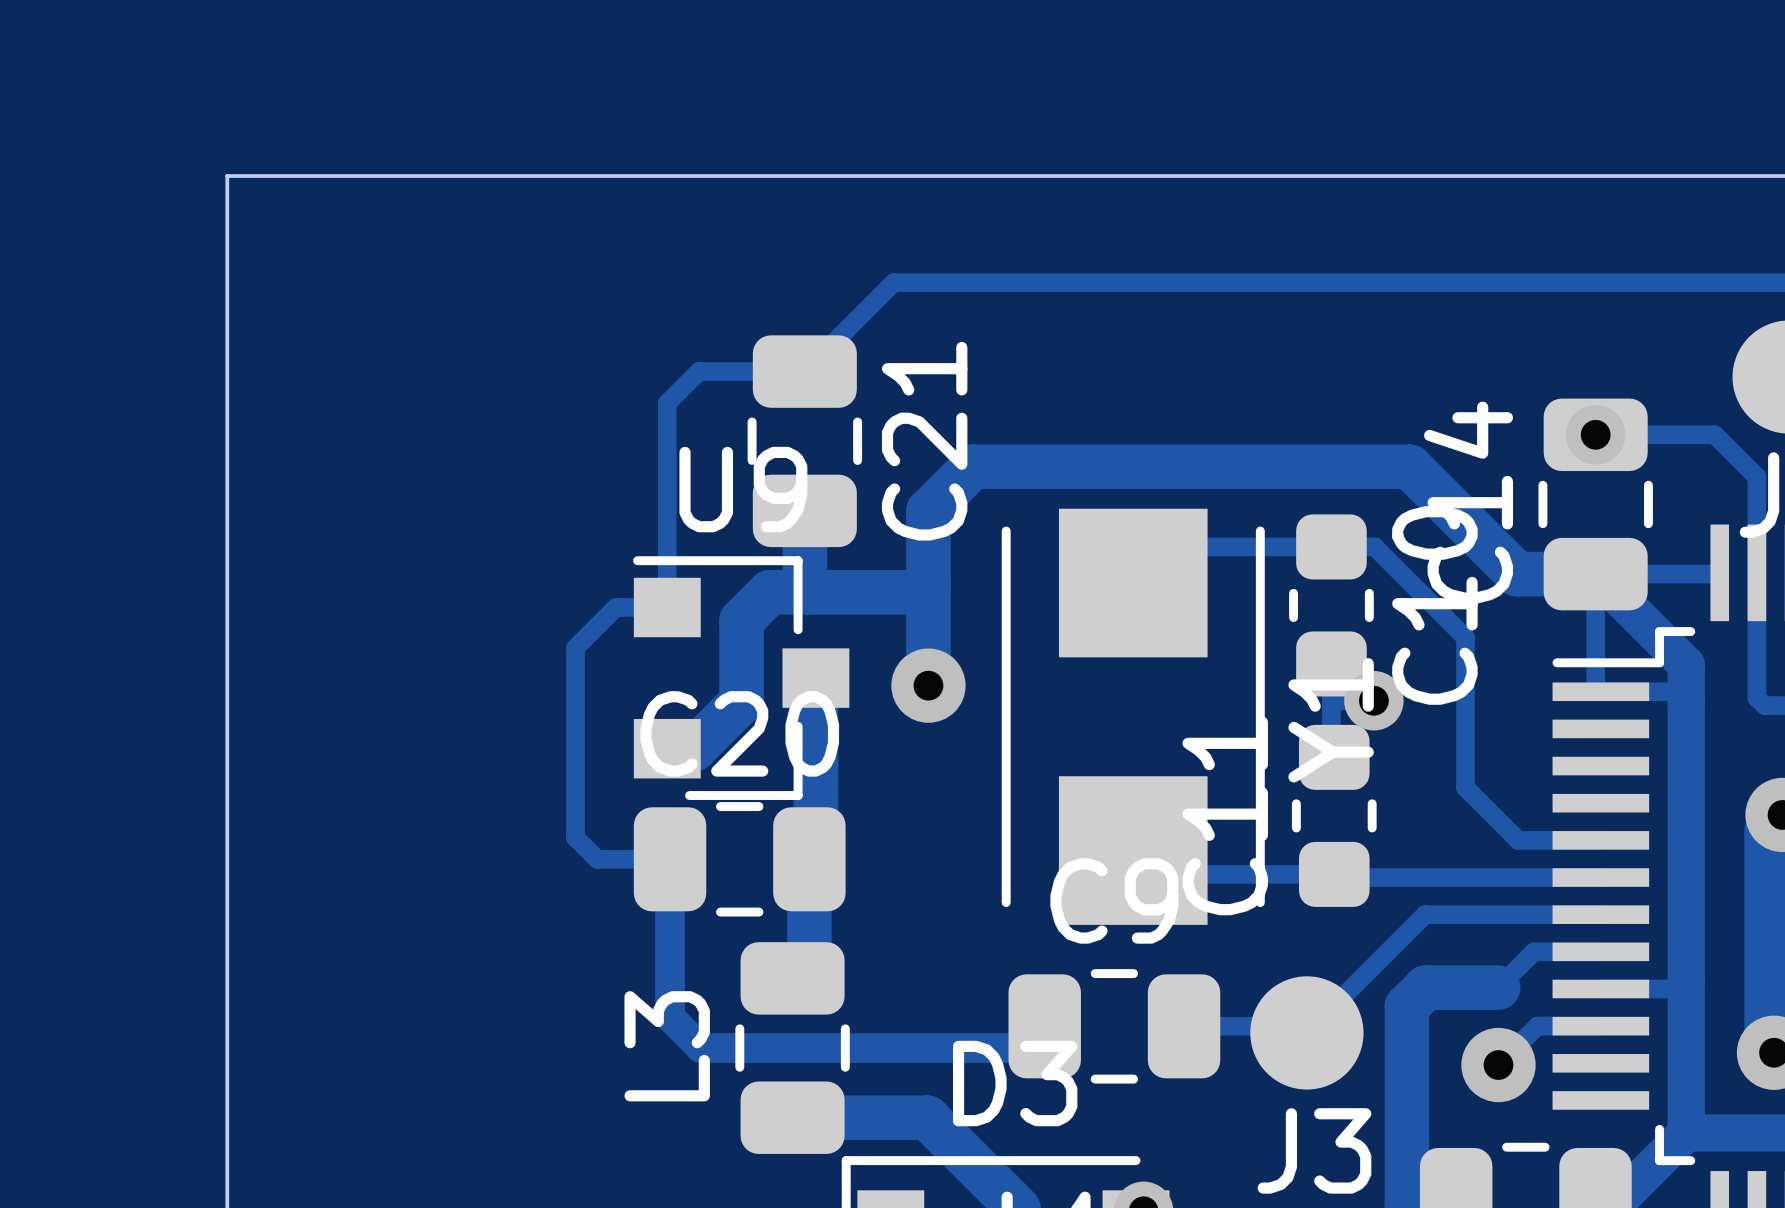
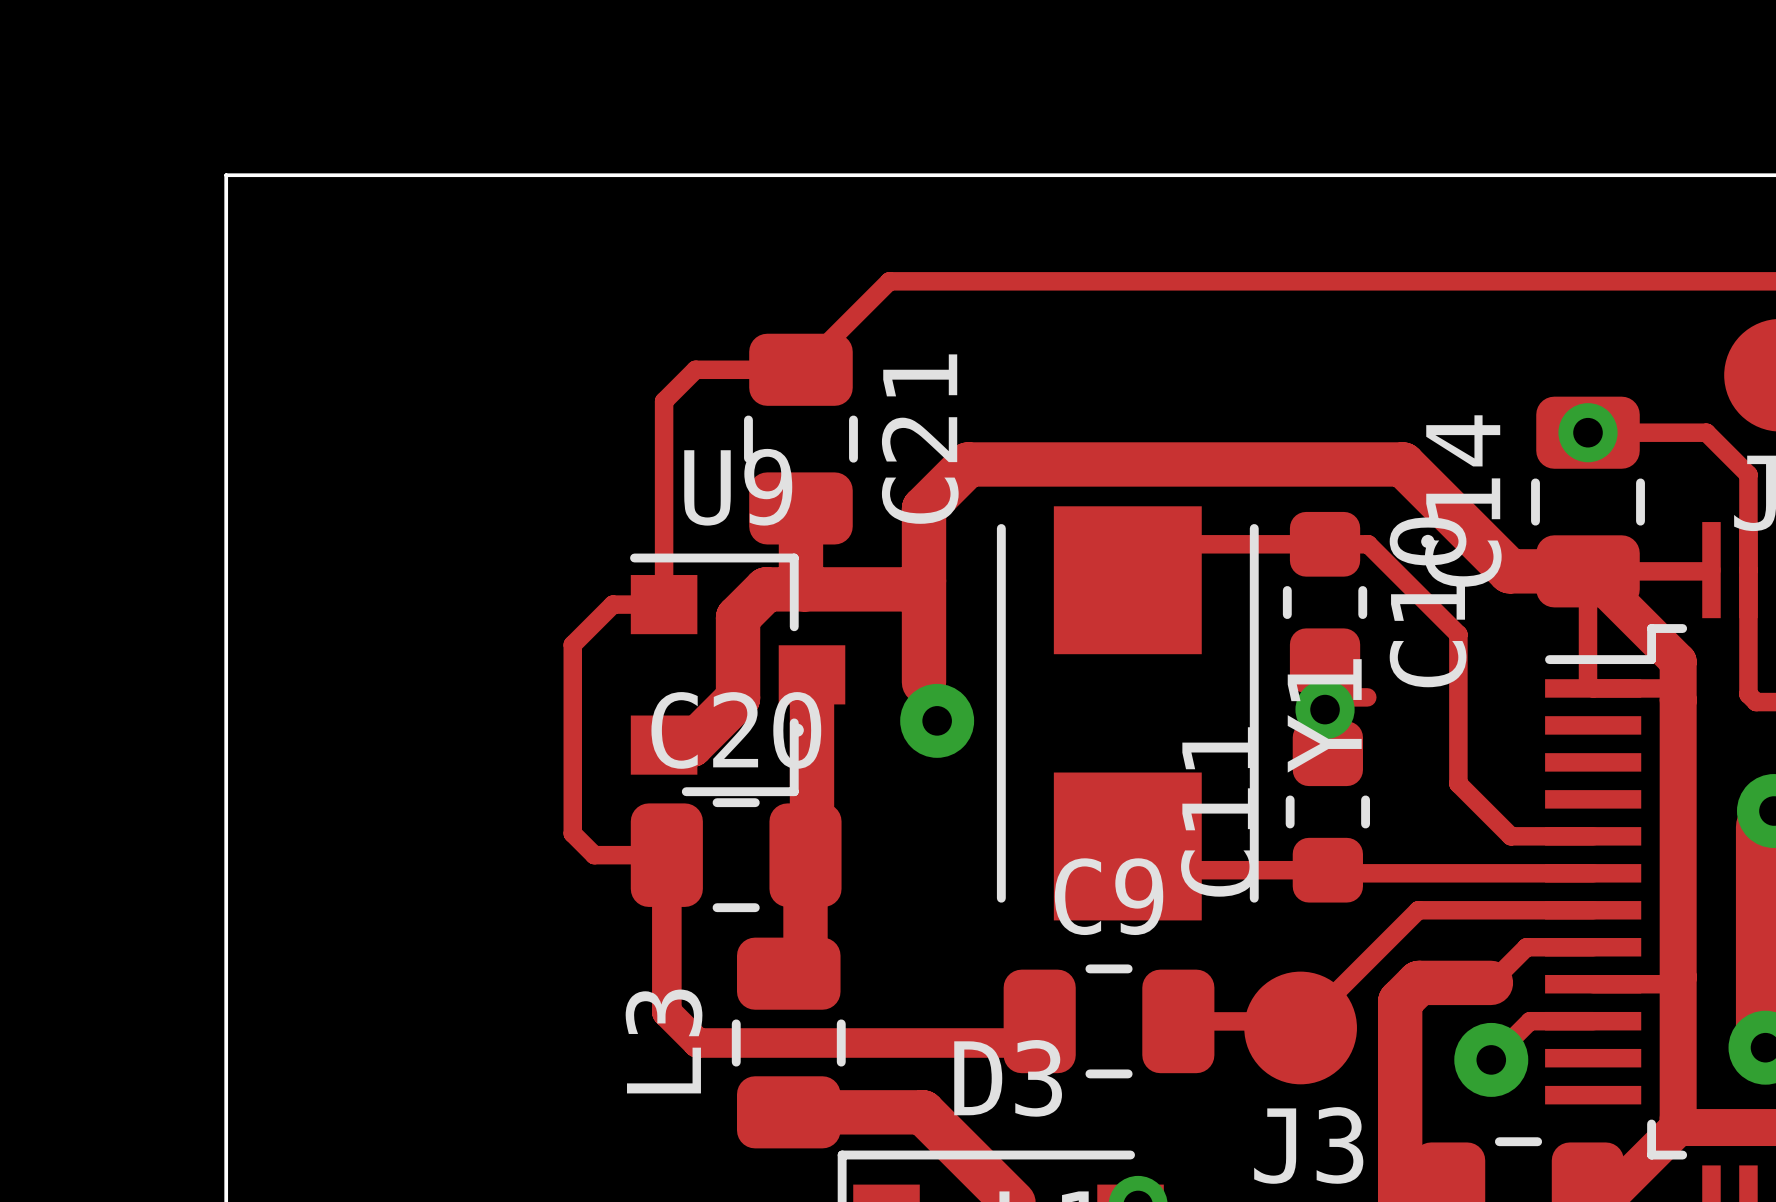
via position: (928, 685) -> (937, 720)
via position: (1373, 700) -> (1325, 709)

